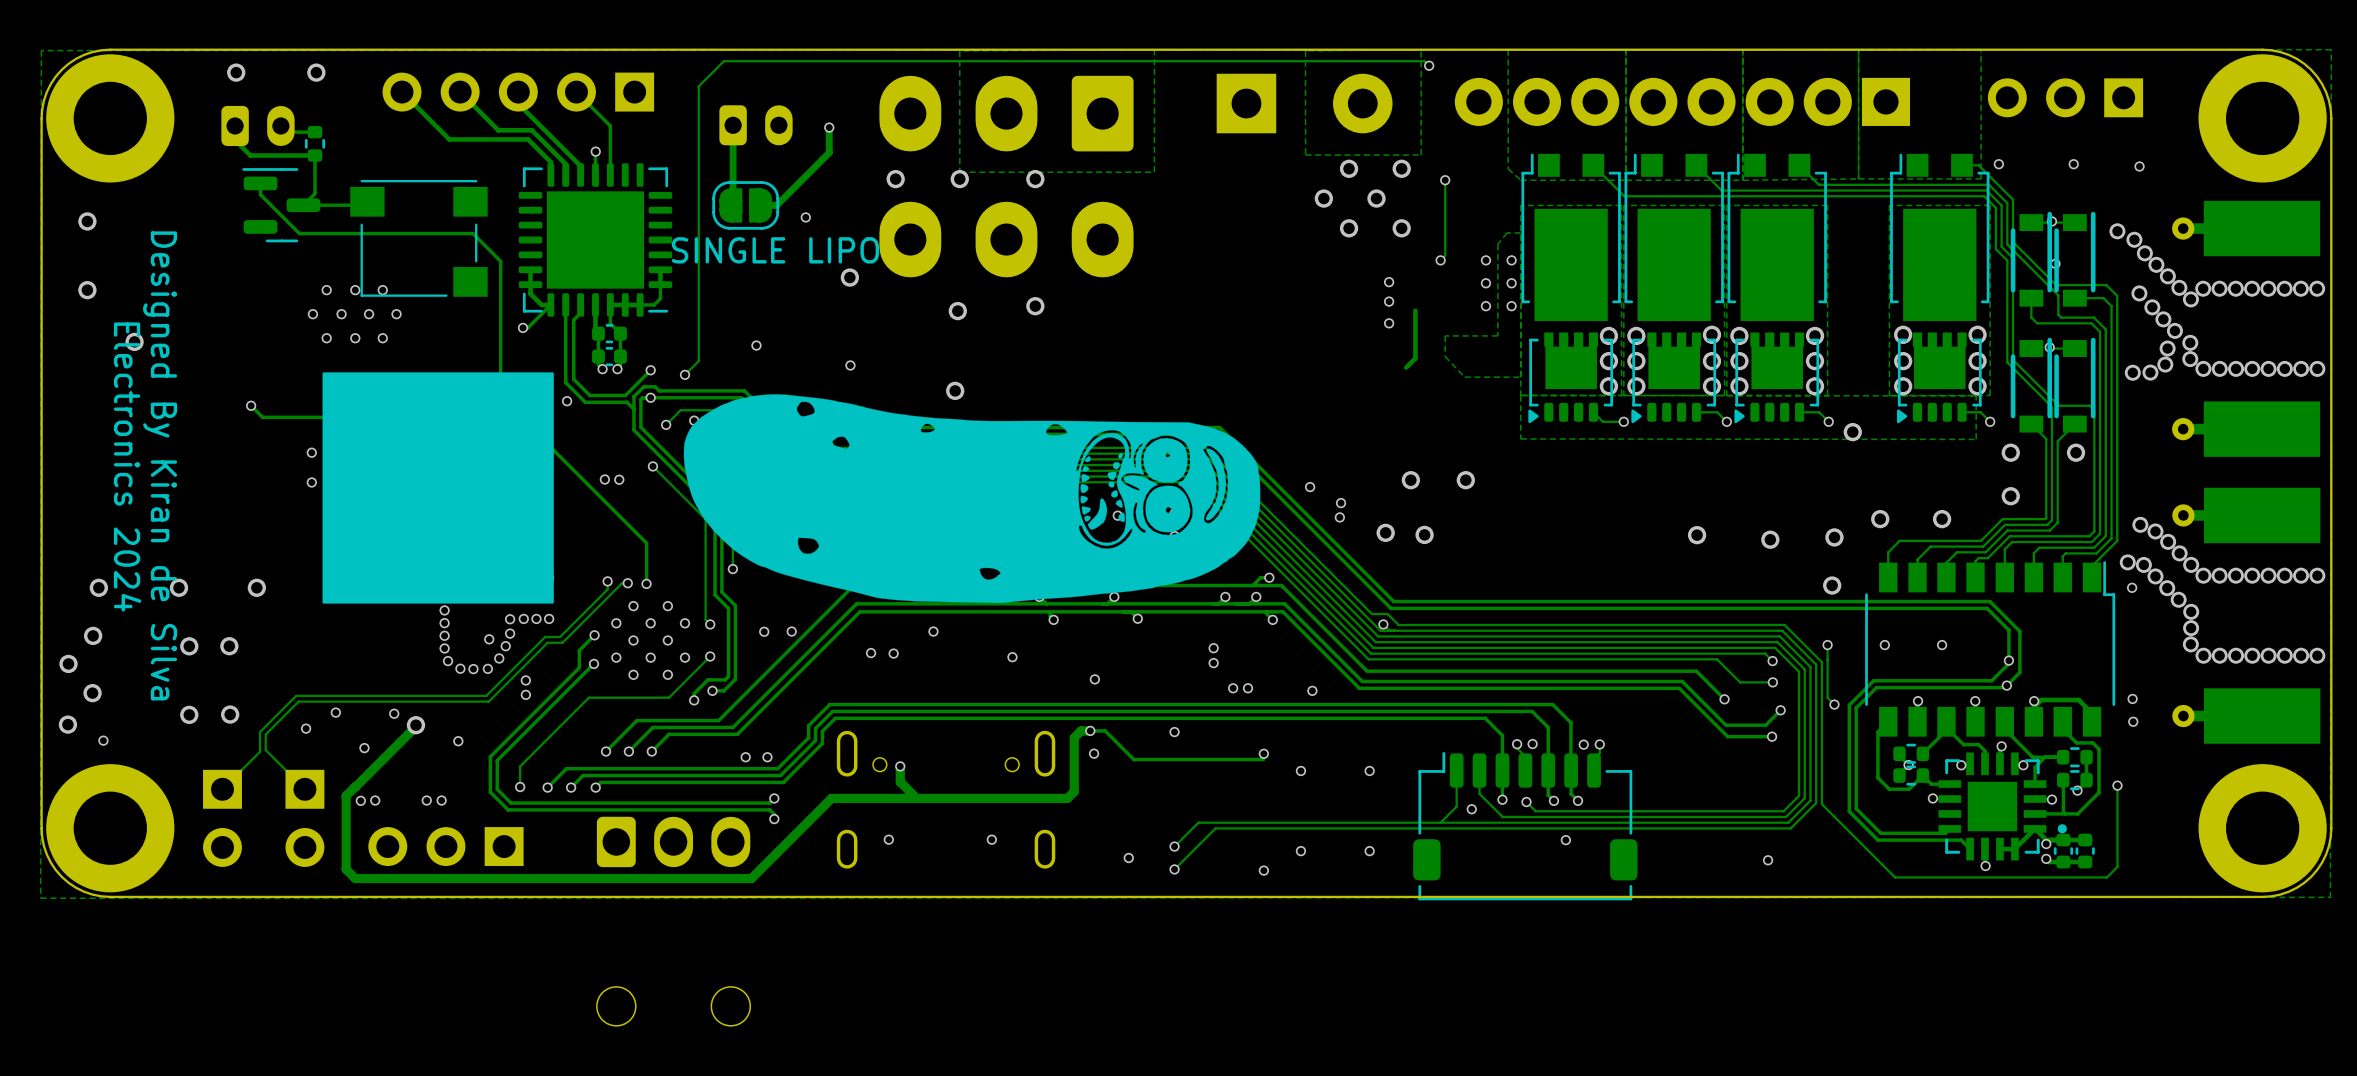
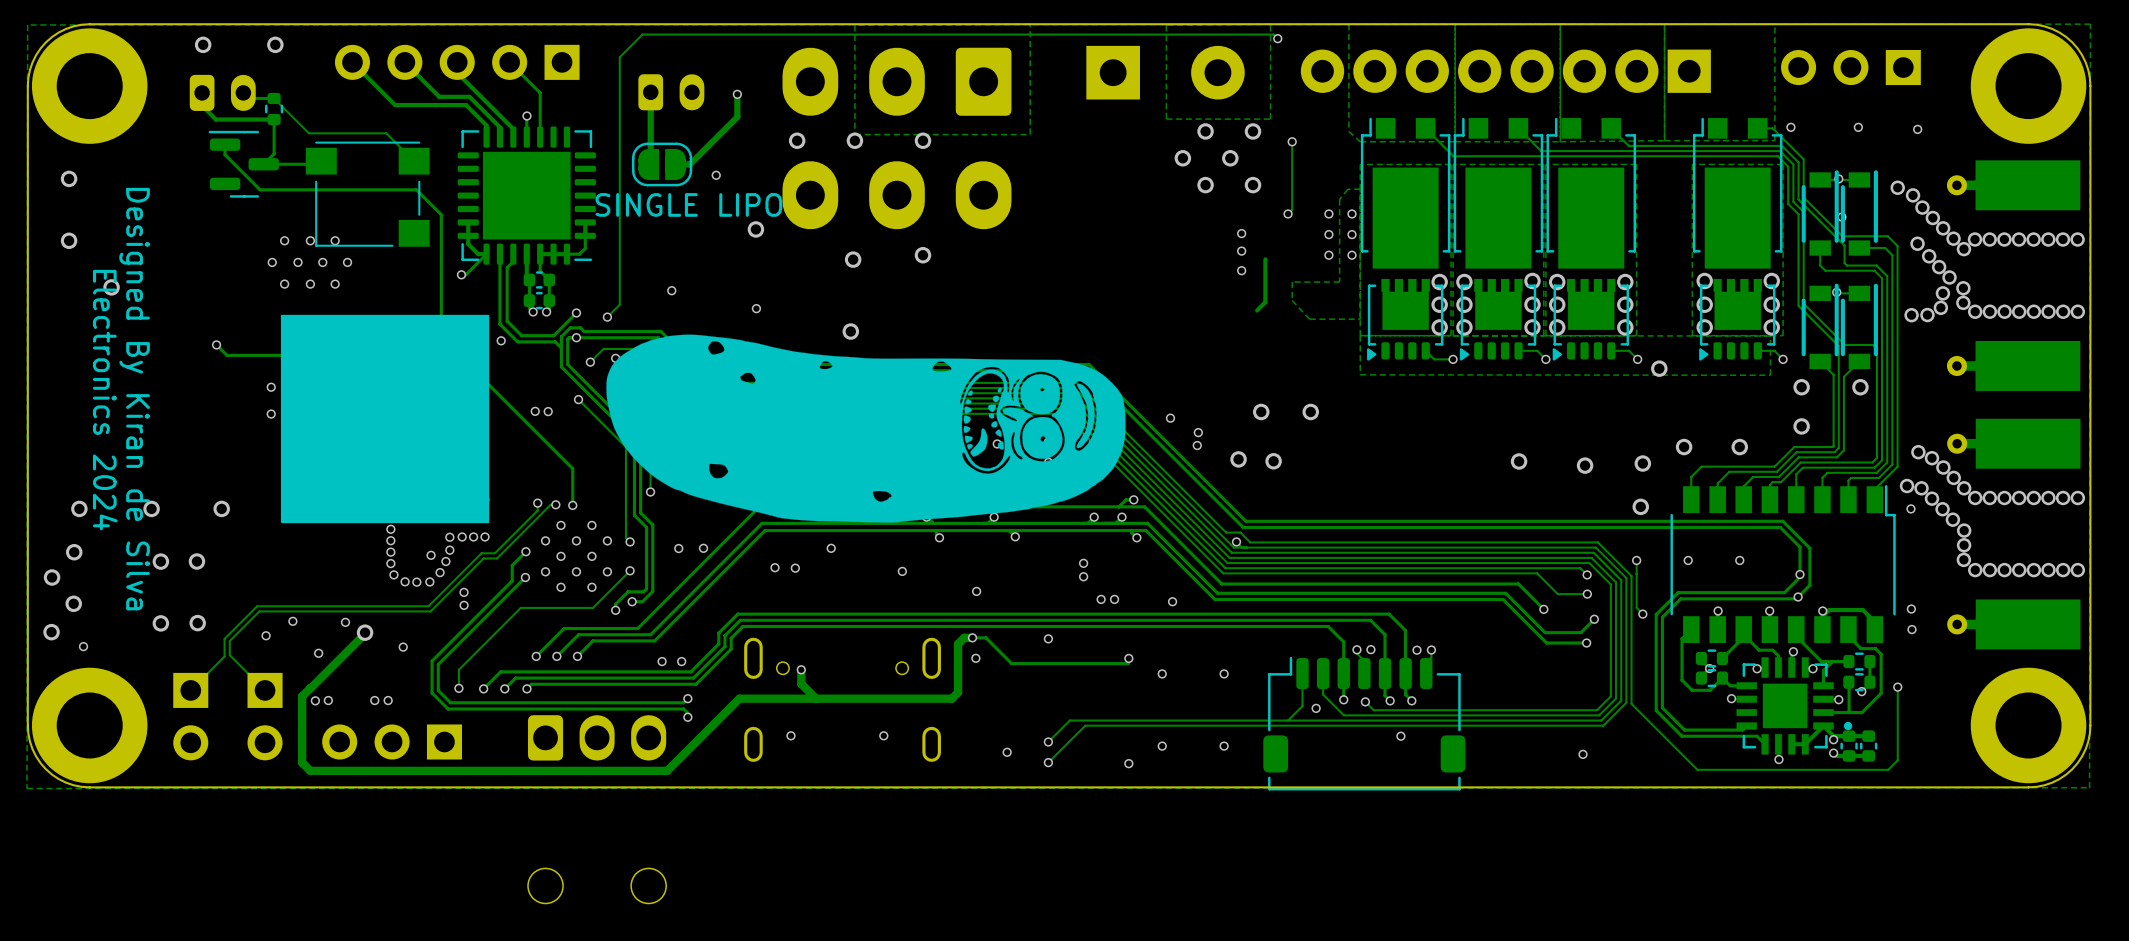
track: none -> (274, 98) (308, 133) (386, 133) (414, 161)

